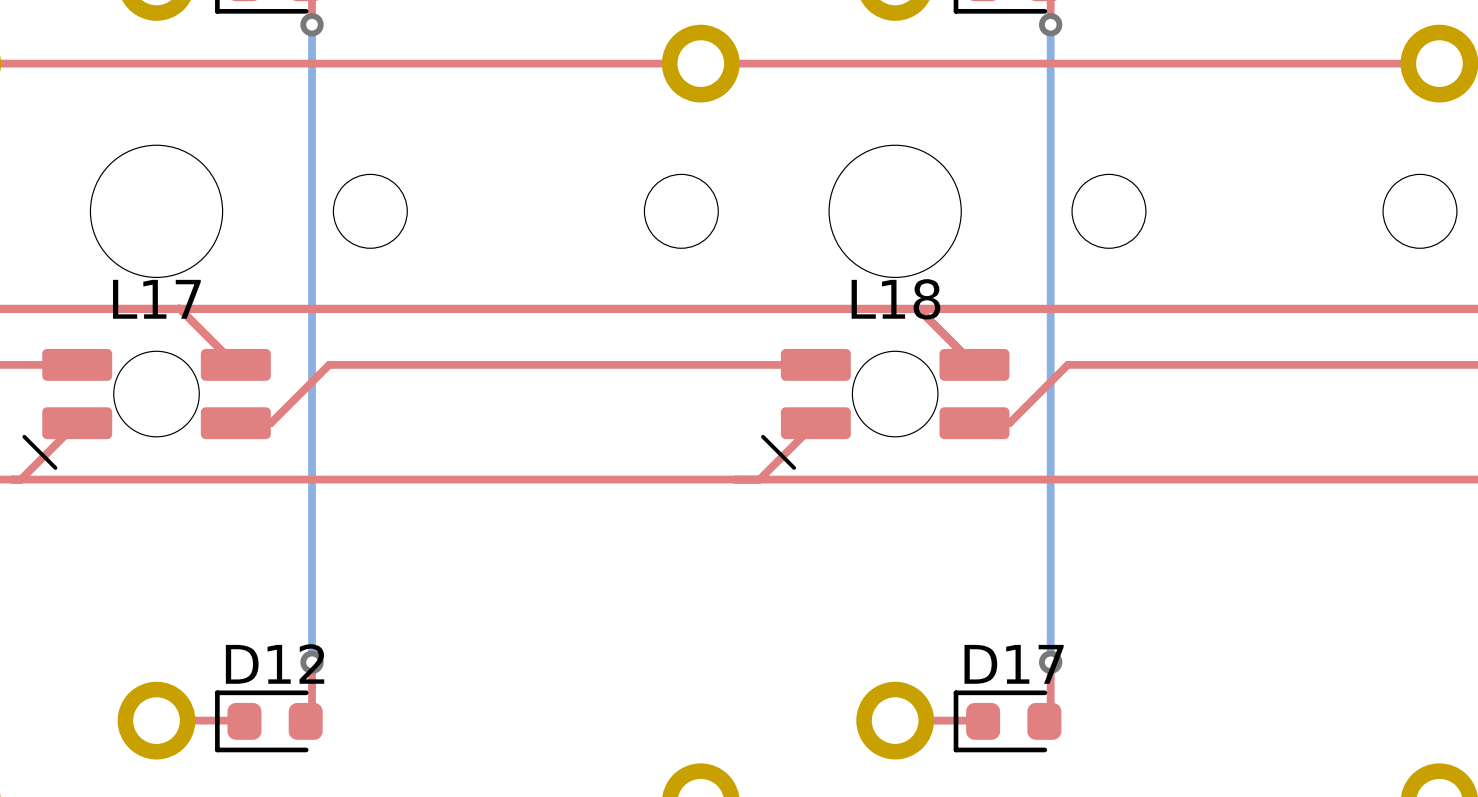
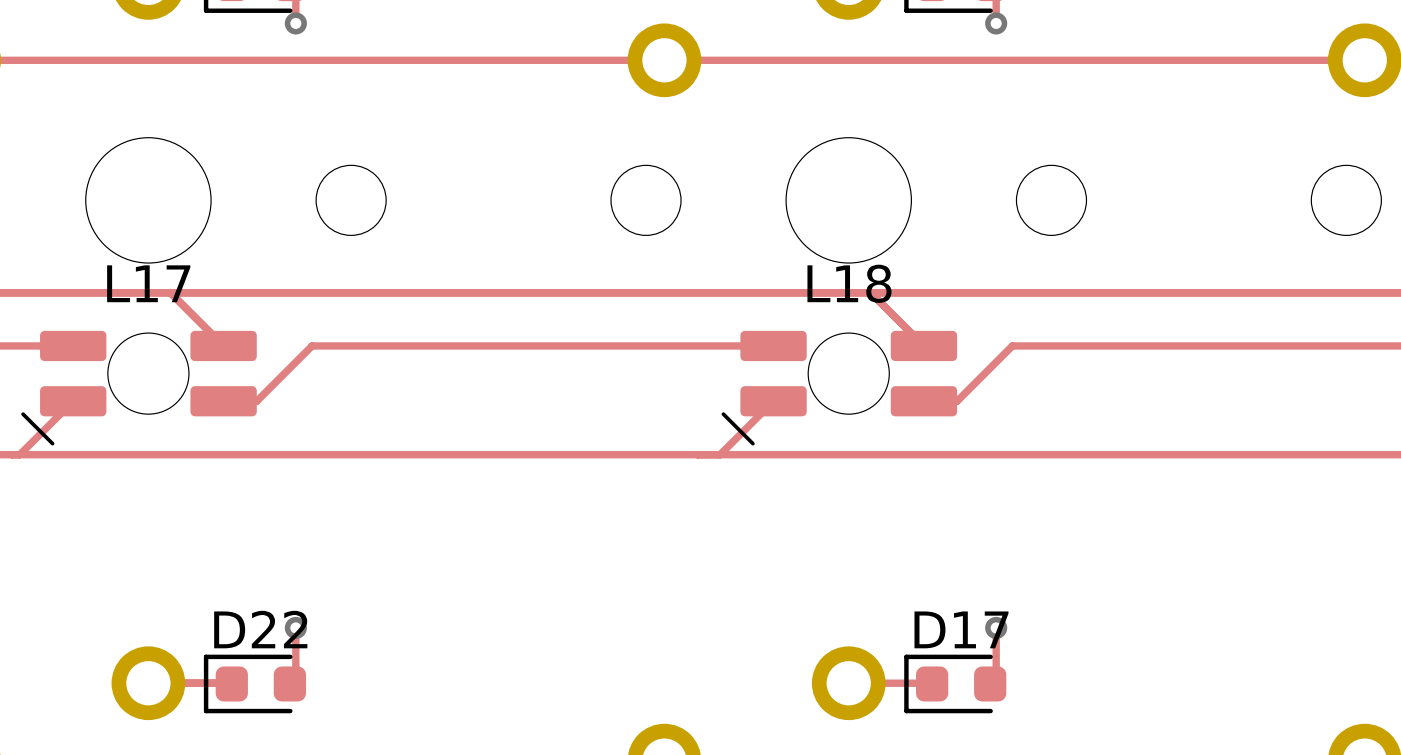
bottom track: (312, 24) (312, 662) -> none
bottom track: (1050, 24) (1050, 662) -> none
D12 name: D12 (275, 663) -> D22 (260, 629)

